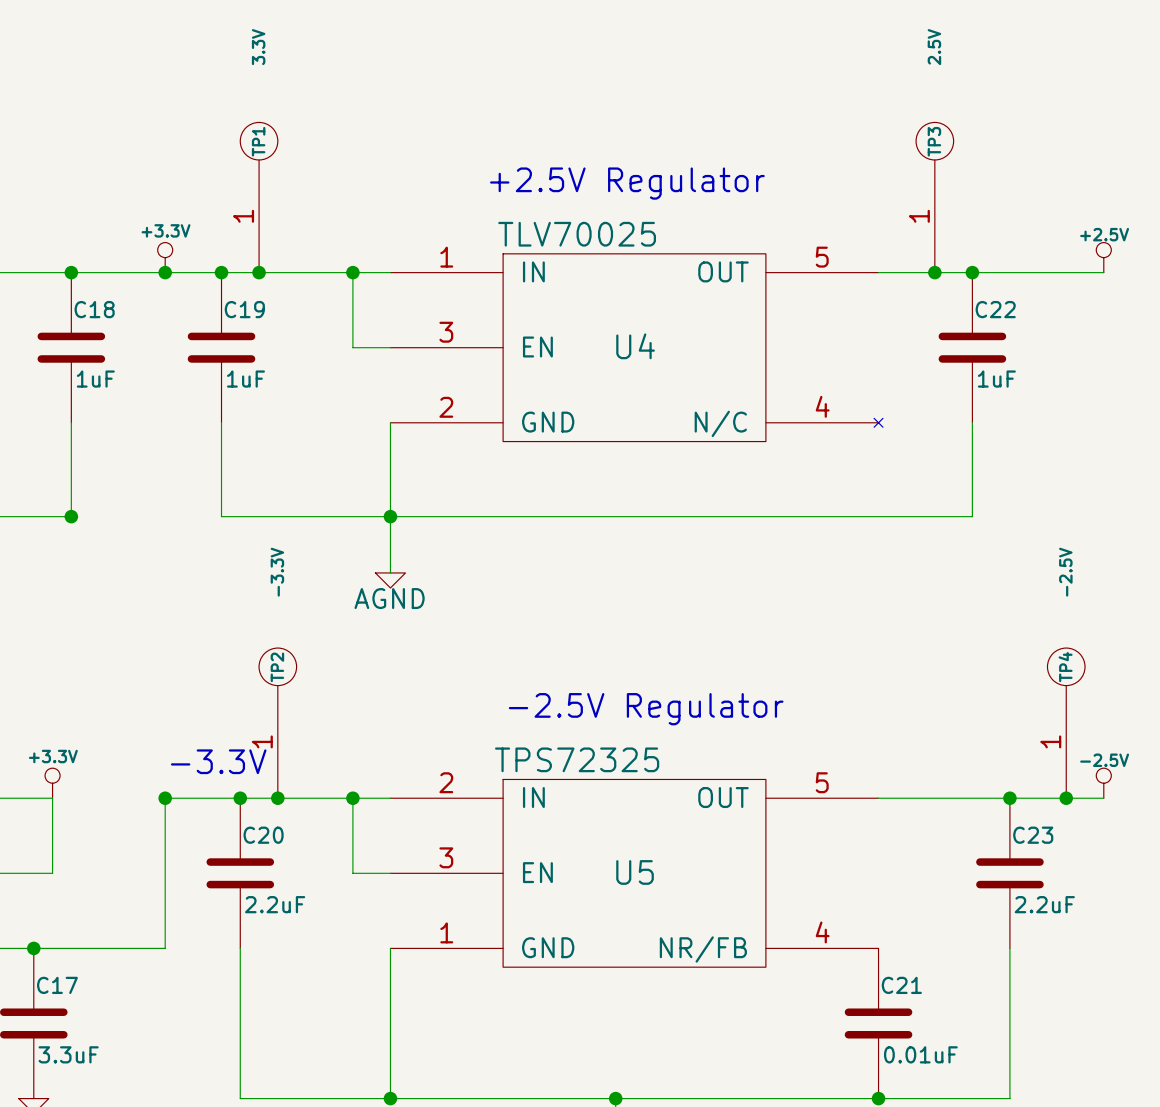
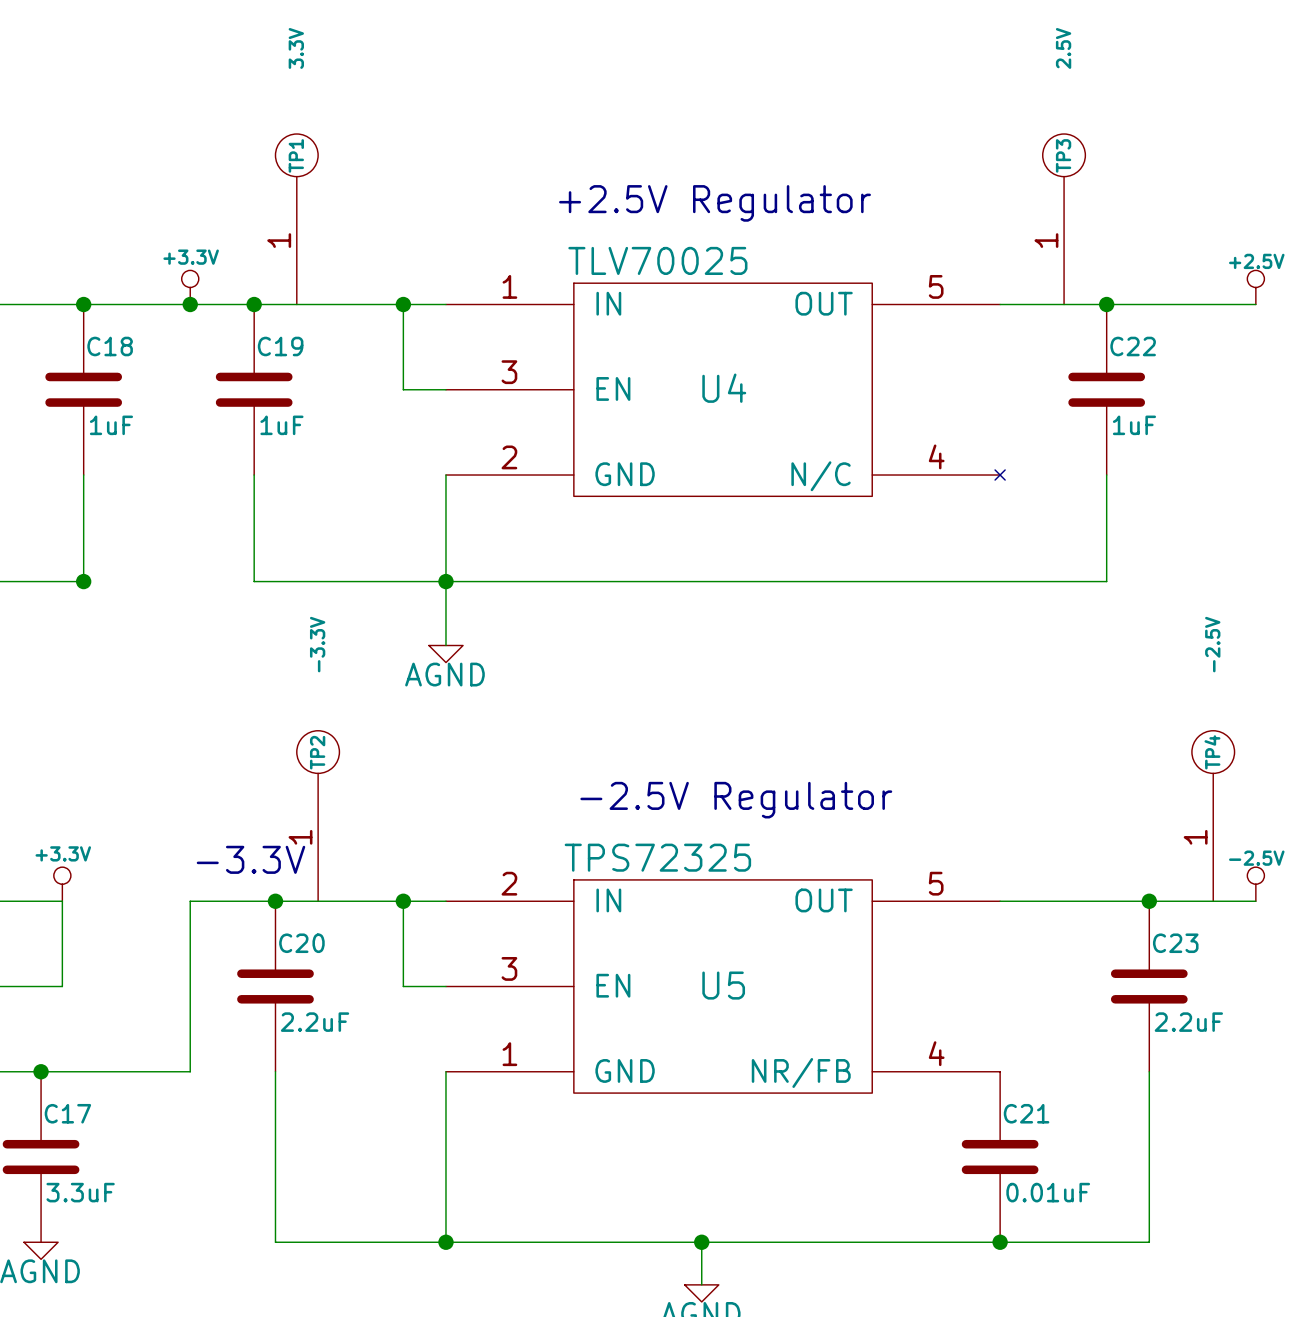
junction: (259, 272) -> none
junction: (934, 272) -> none
junction: (165, 798) -> none
junction: (277, 798) -> none
junction: (1066, 798) -> none

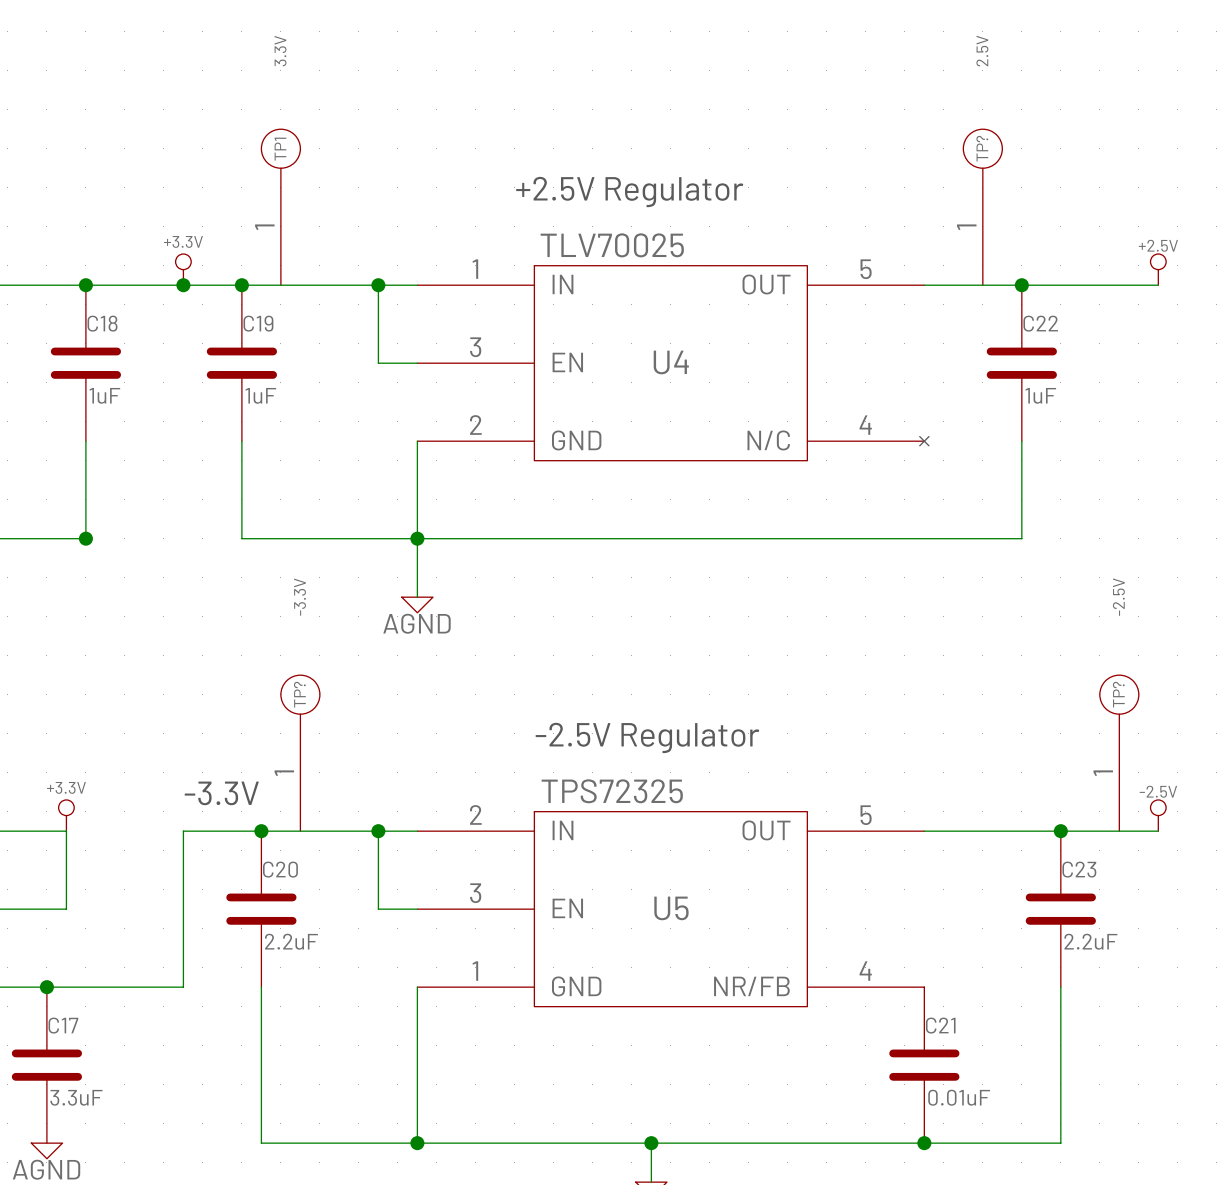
TP3 name: TP3 (1063, 155) -> TP? (982, 148)
TP2 name: TP2 (317, 752) -> TP? (299, 694)
TP4 name: TP4 (1212, 752) -> TP? (1118, 694)

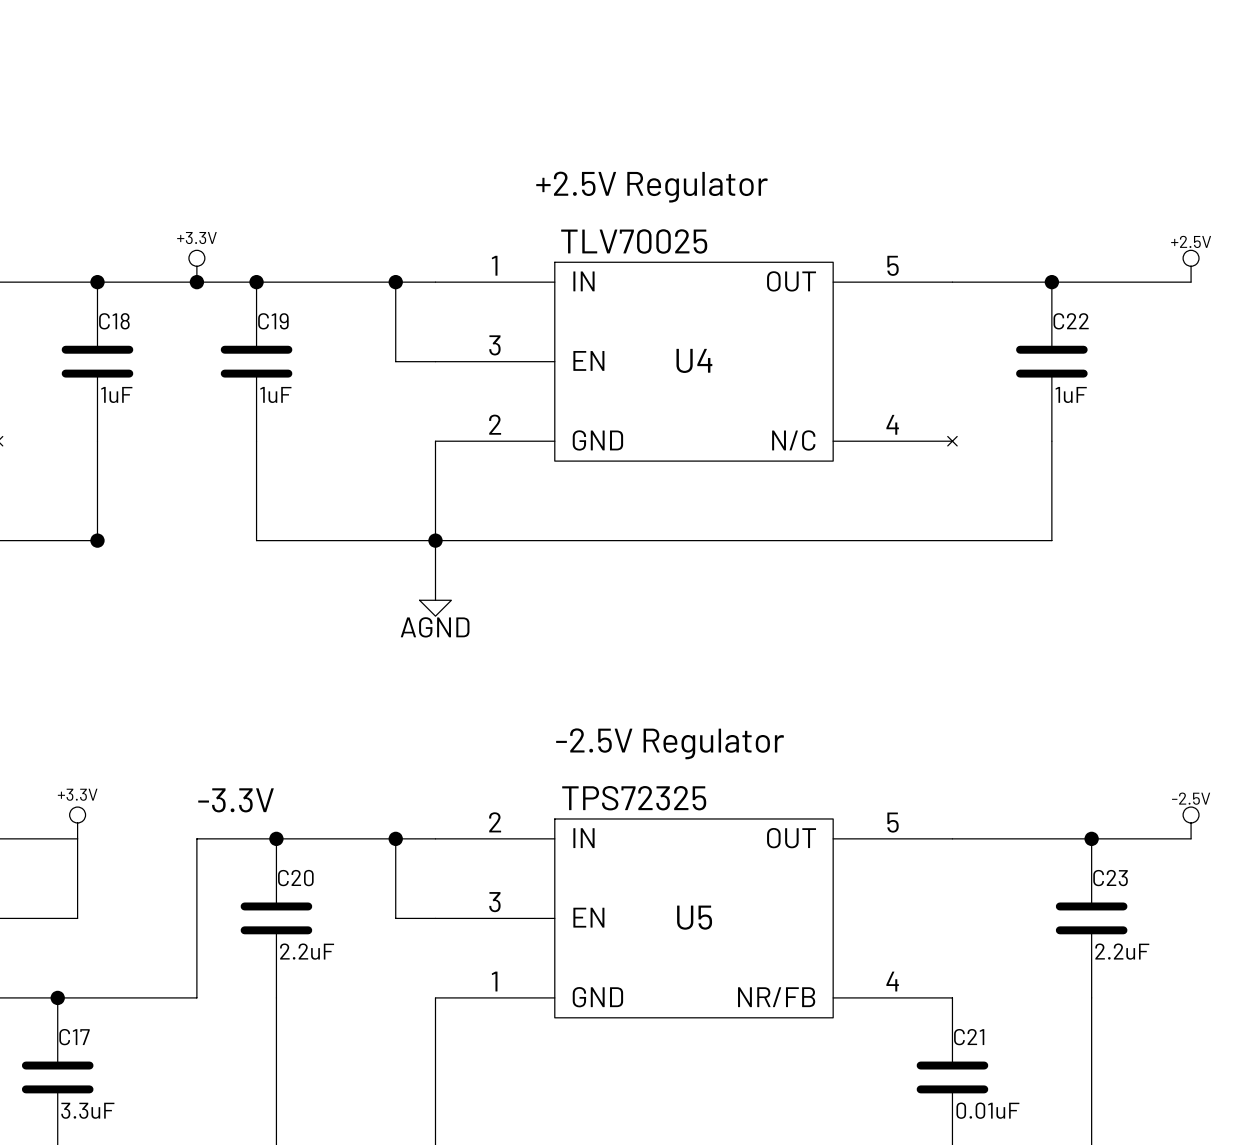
TP1: 3.3V (280, 207) -> none
TP?: 2.5V (982, 207) -> none
TP?: -3.3V (300, 753) -> none
TP?: -2.5V (1119, 753) -> none

